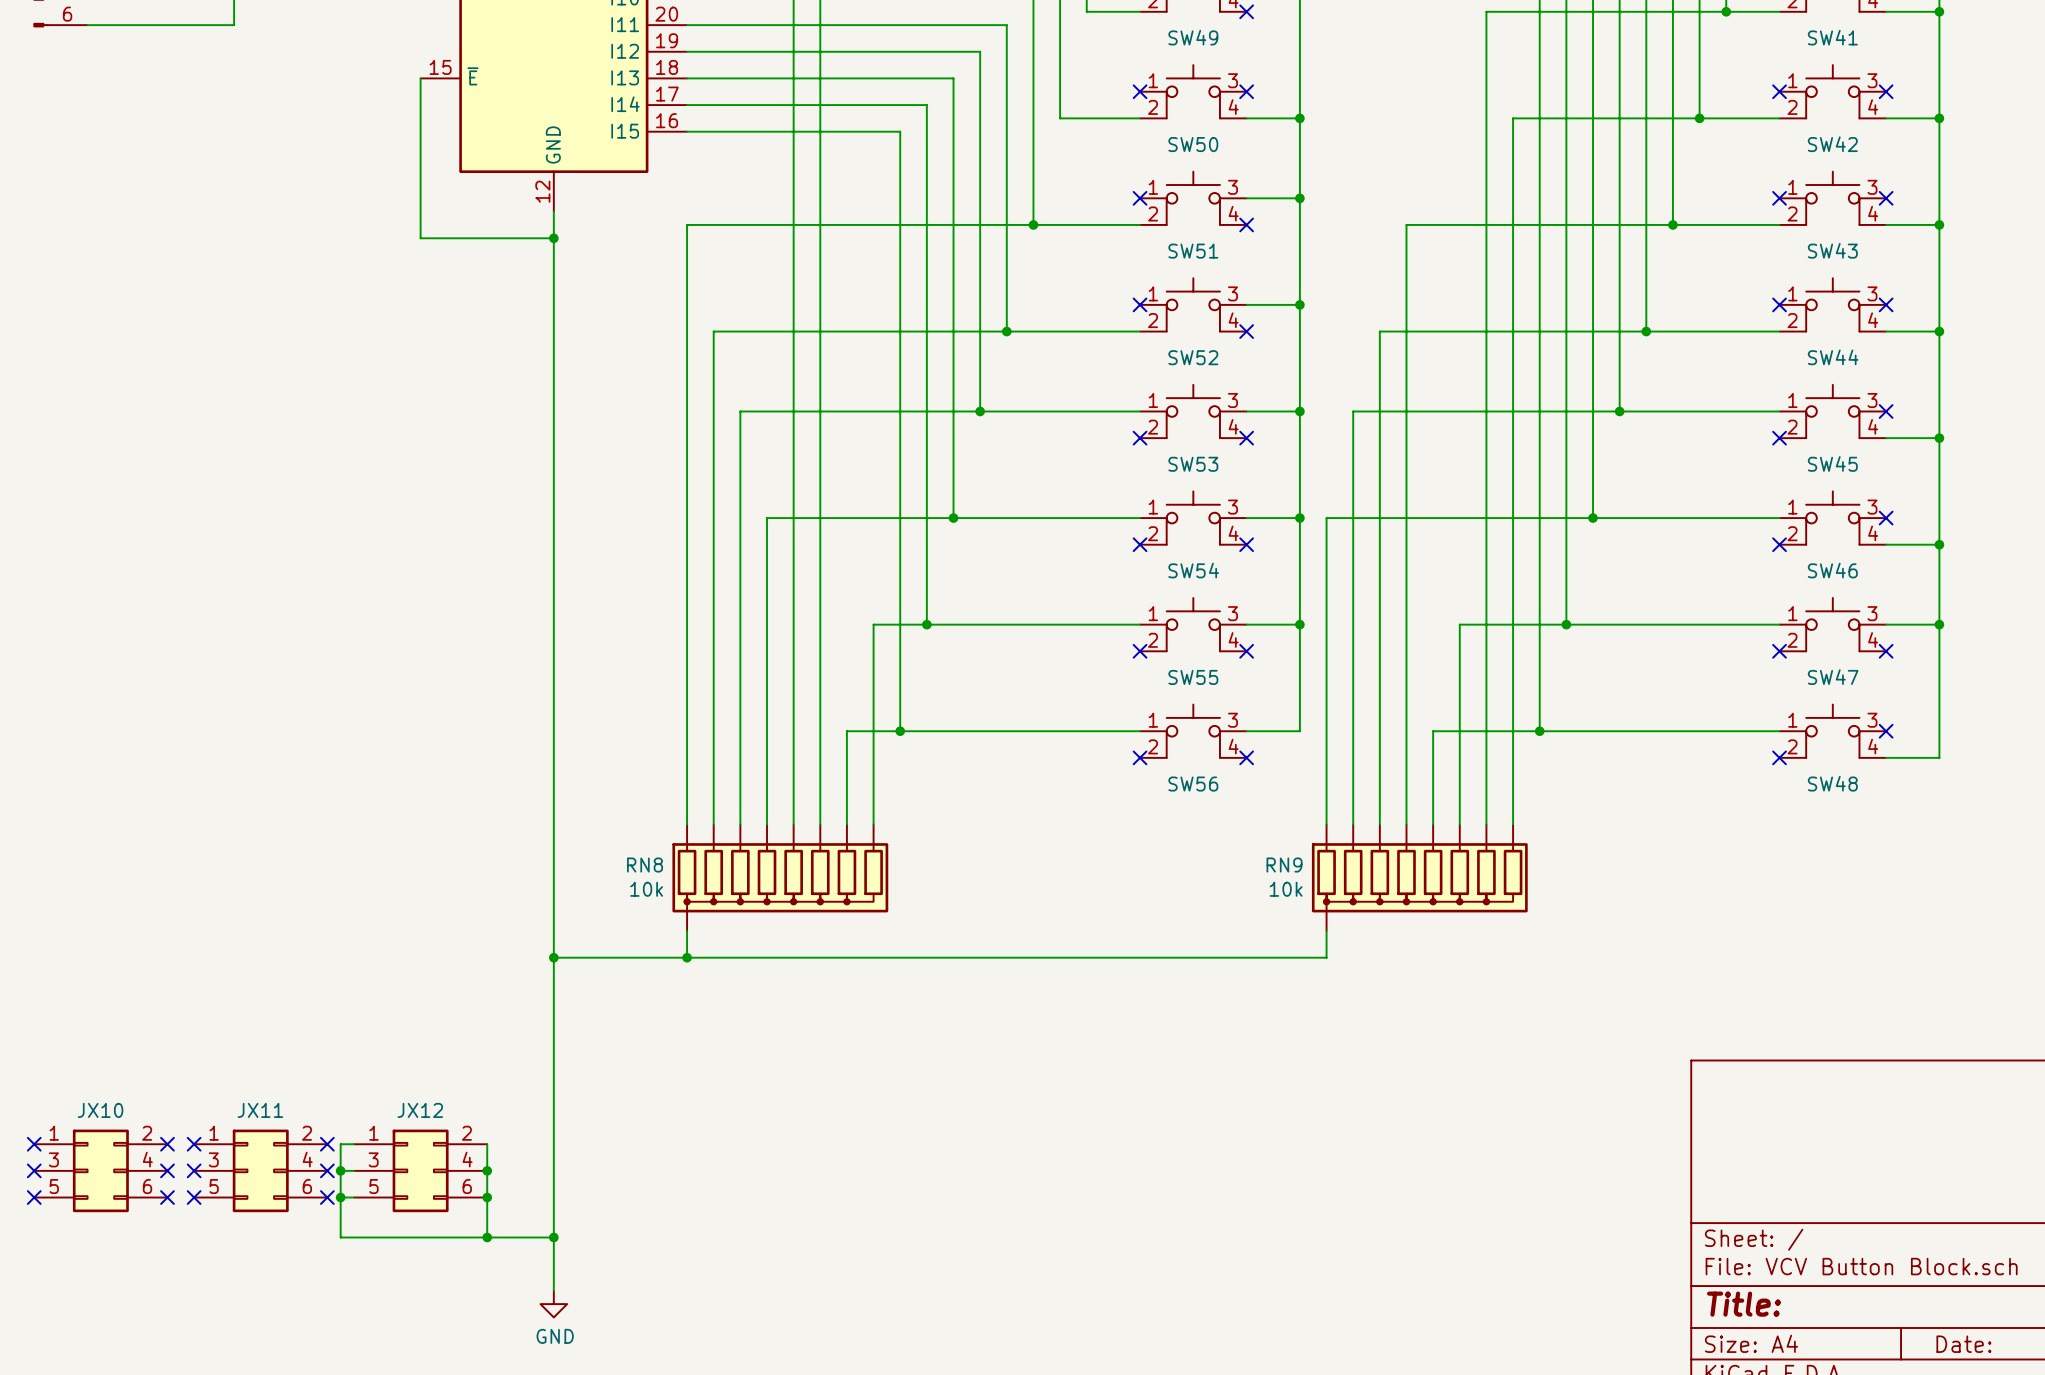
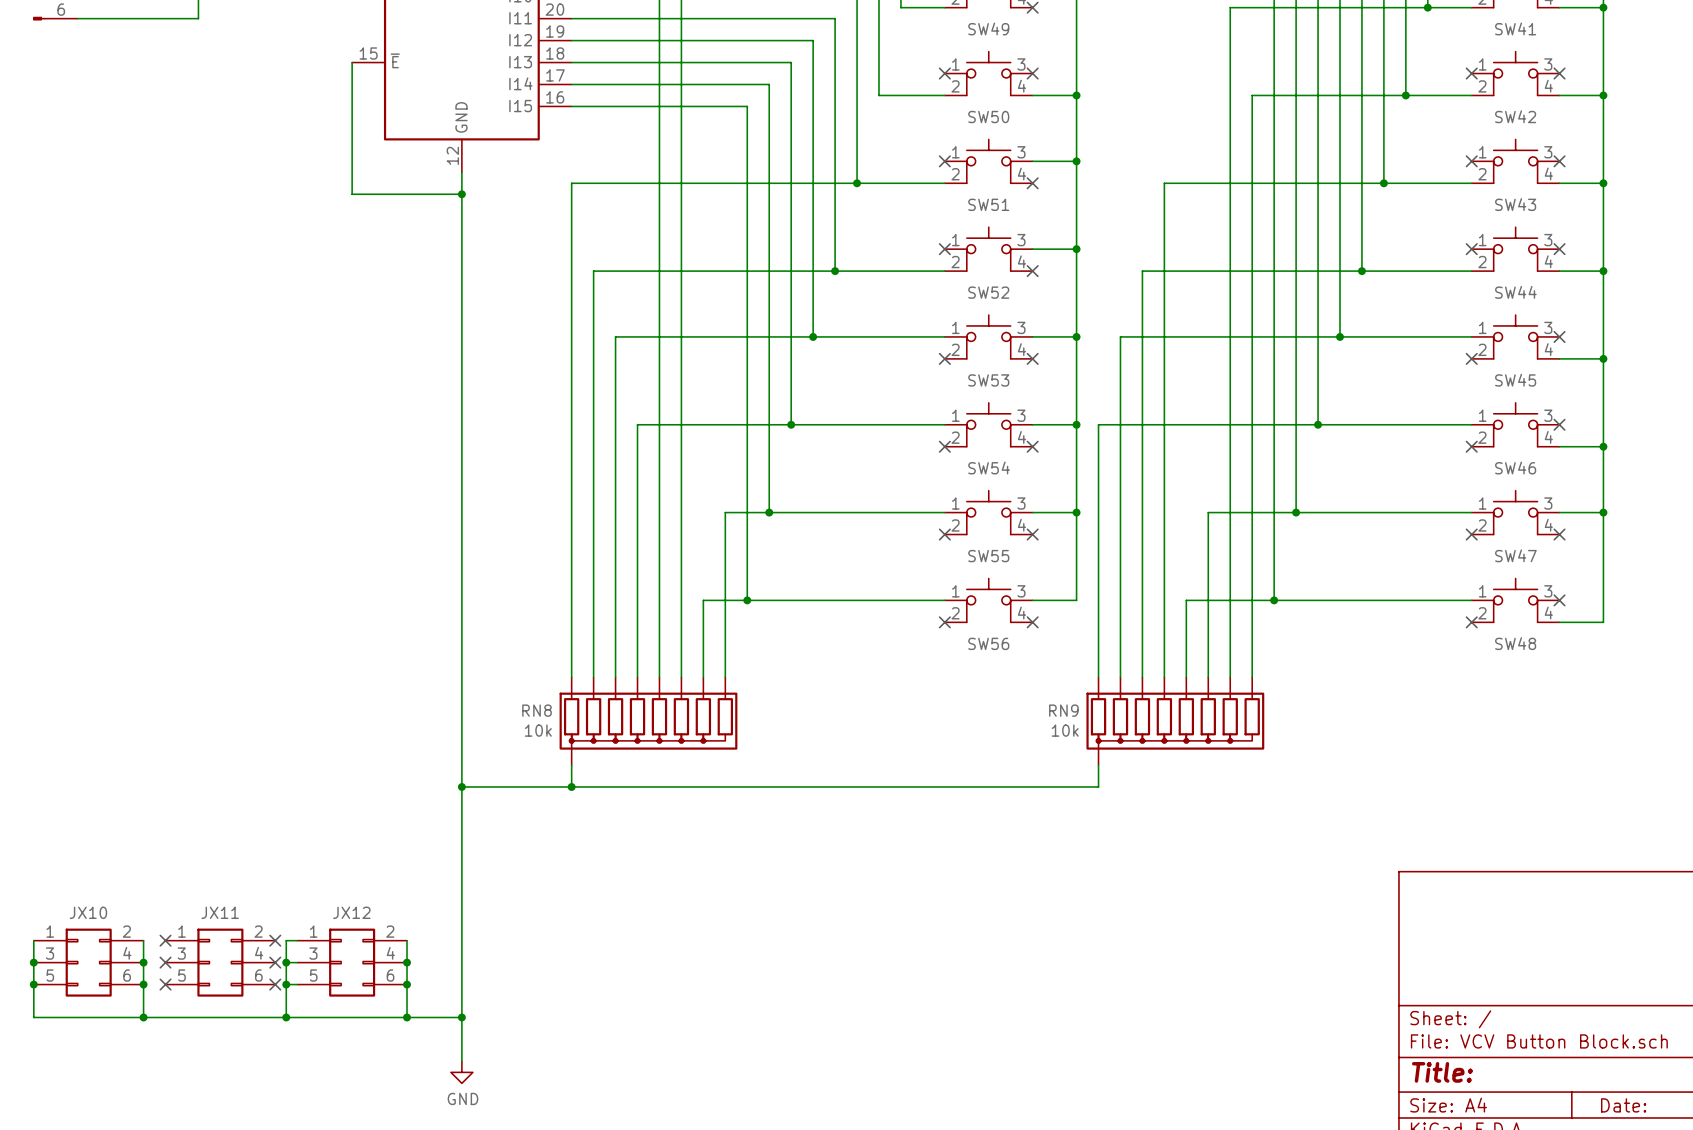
wire: none -> (33, 940) (33, 1017) (286, 1017)
no-connect mark: (34, 1144) -> none
wire: none -> (143, 940) (143, 1017)
no-connect mark: (167, 1144) -> none
no-connect mark: (34, 1170) -> none
junction: none -> (33, 962)
no-connect mark: (167, 1170) -> none
junction: none -> (143, 962)
no-connect mark: (34, 1197) -> none
junction: none -> (33, 984)
no-connect mark: (167, 1197) -> none
junction: none -> (143, 984)
junction: none -> (143, 1017)
junction: none -> (286, 1017)

